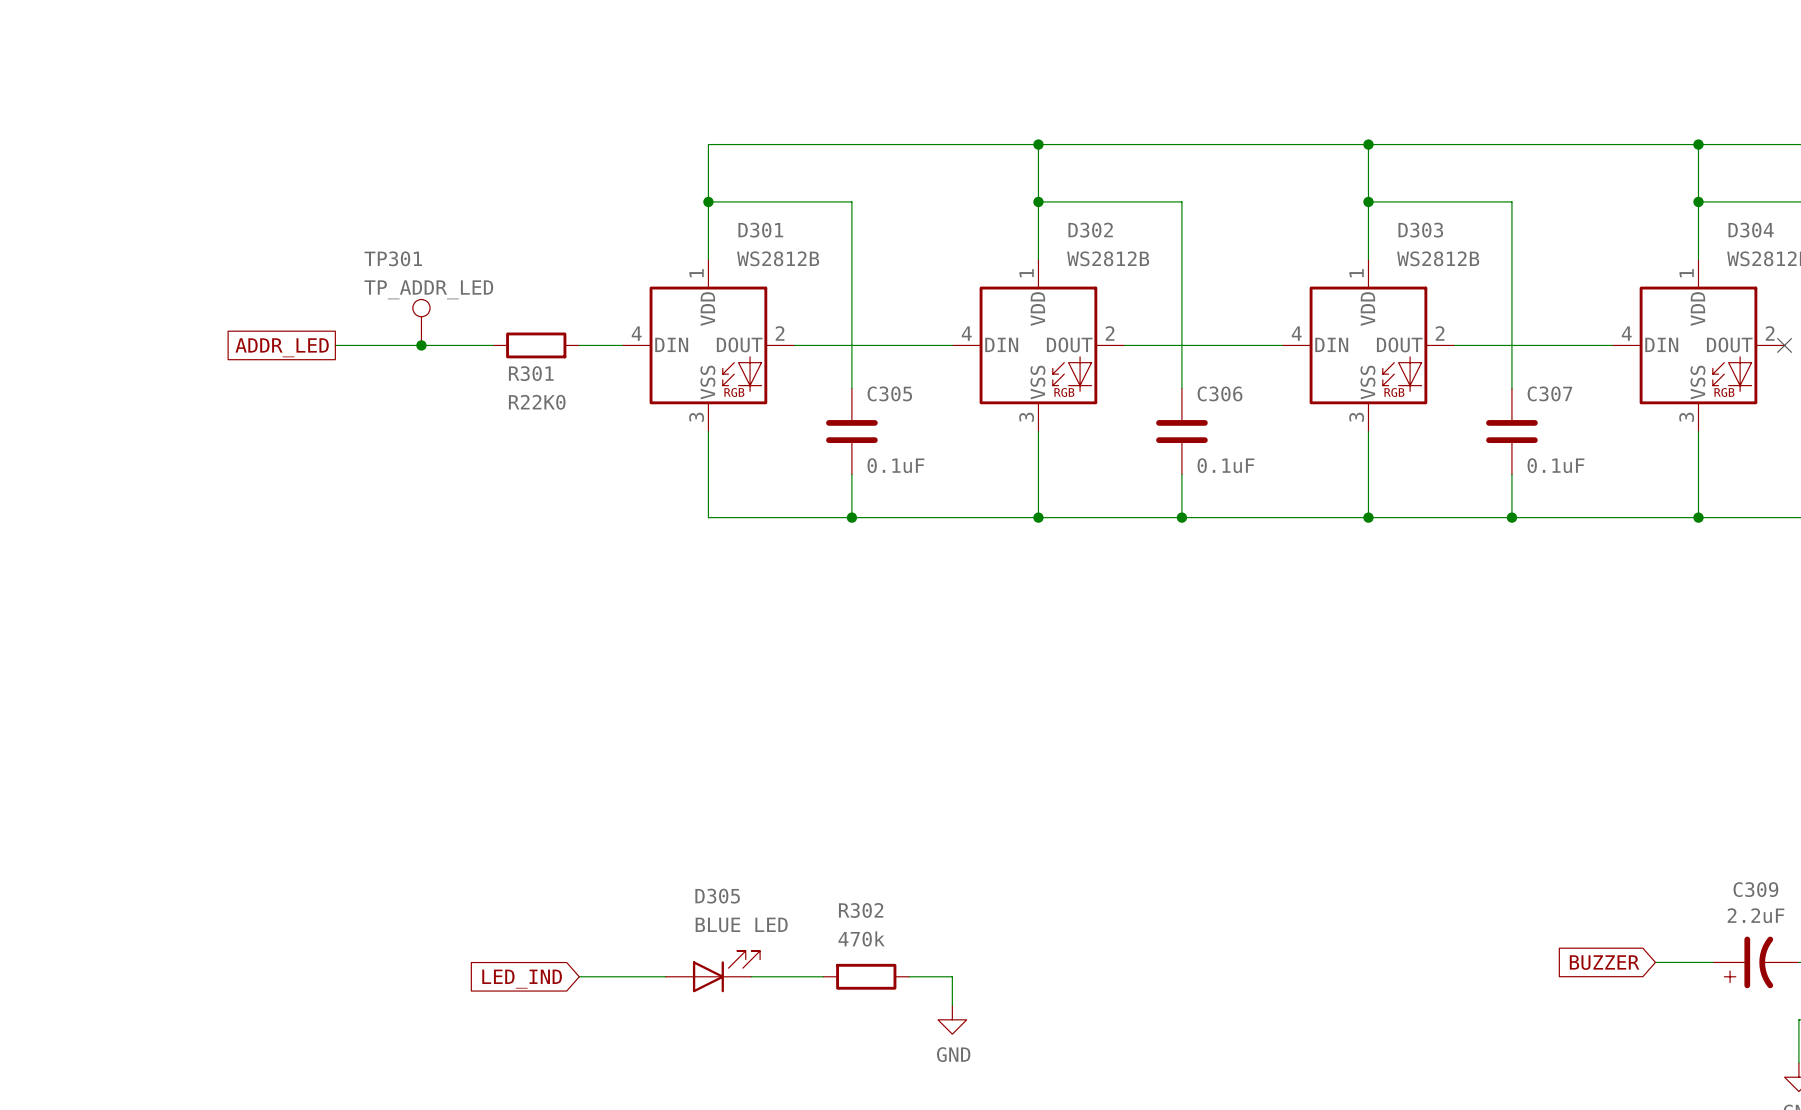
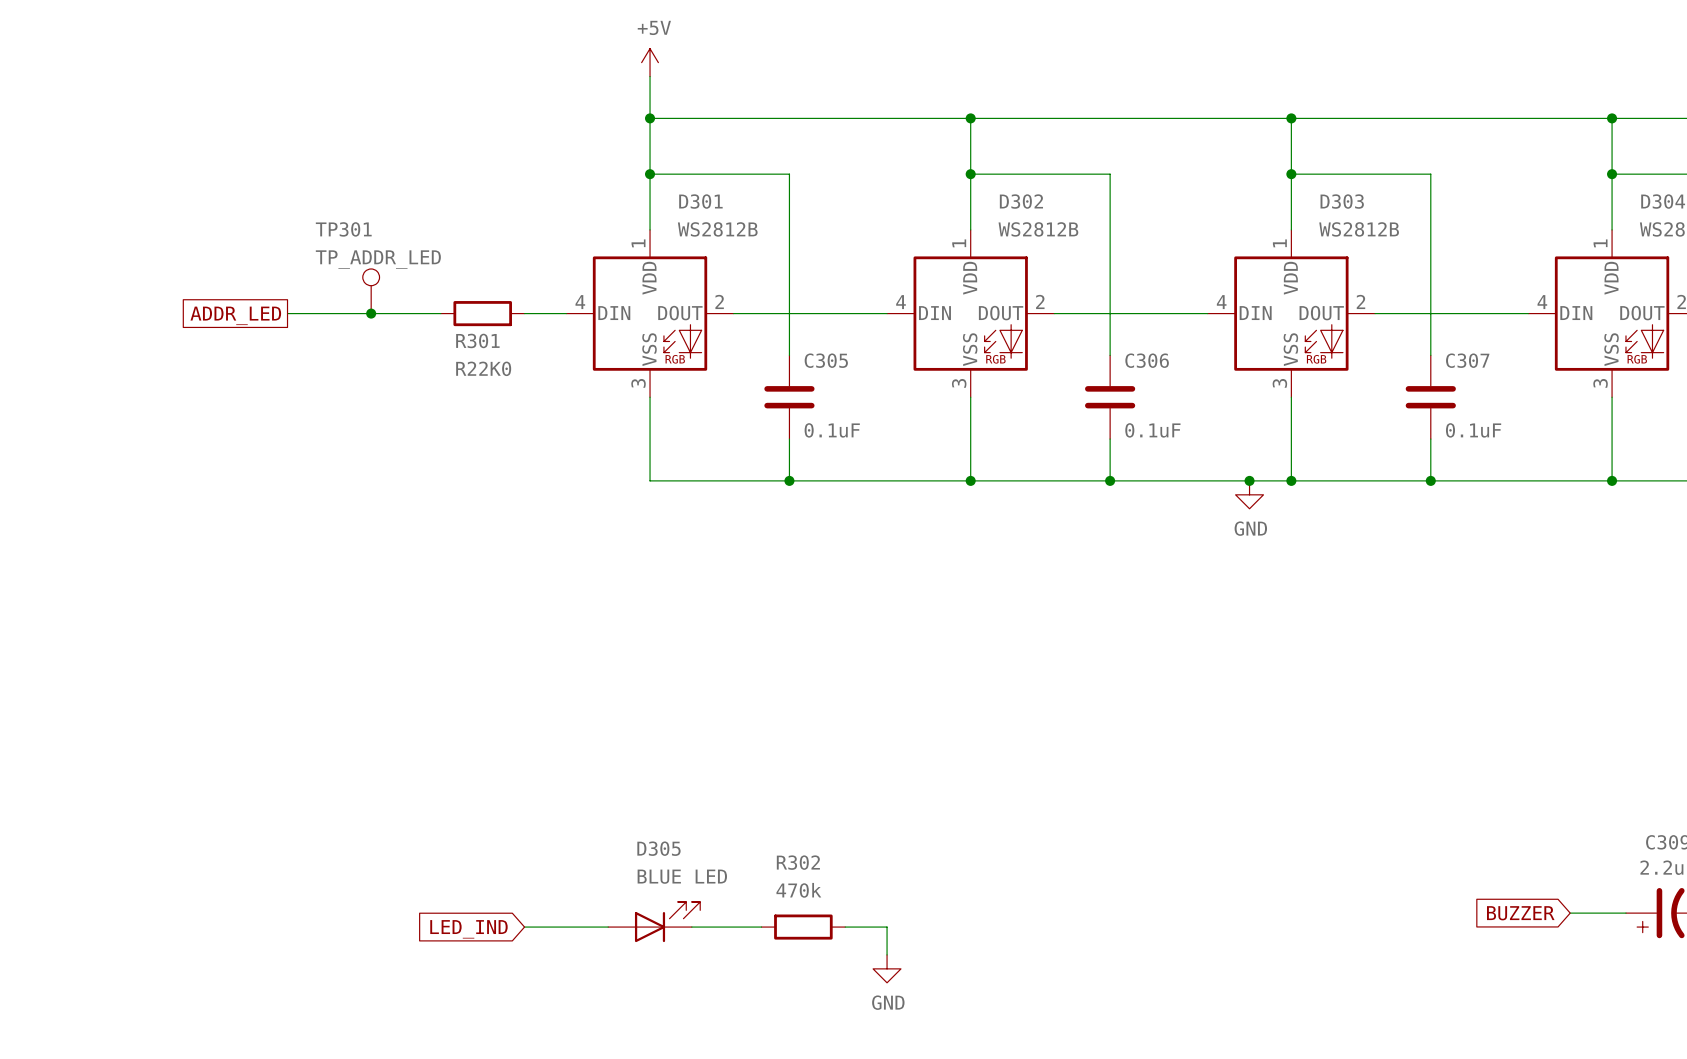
power symbol: none -> +5V (650, 62)
wire: none -> (650, 76) (650, 118)
junction: none -> (650, 118)
junction: none -> (1249, 480)
power symbol: none -> GND (1249, 494)

